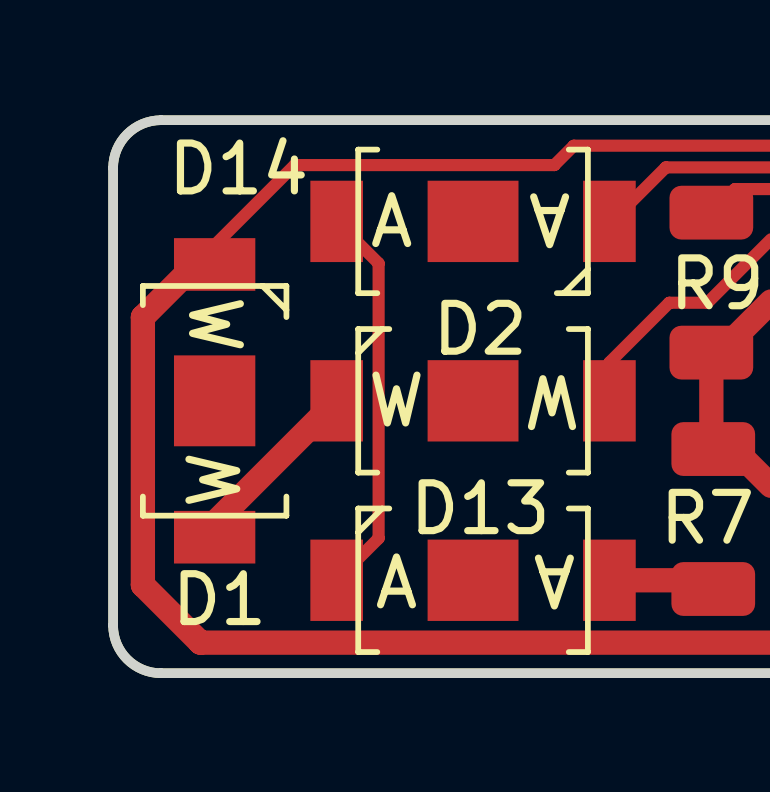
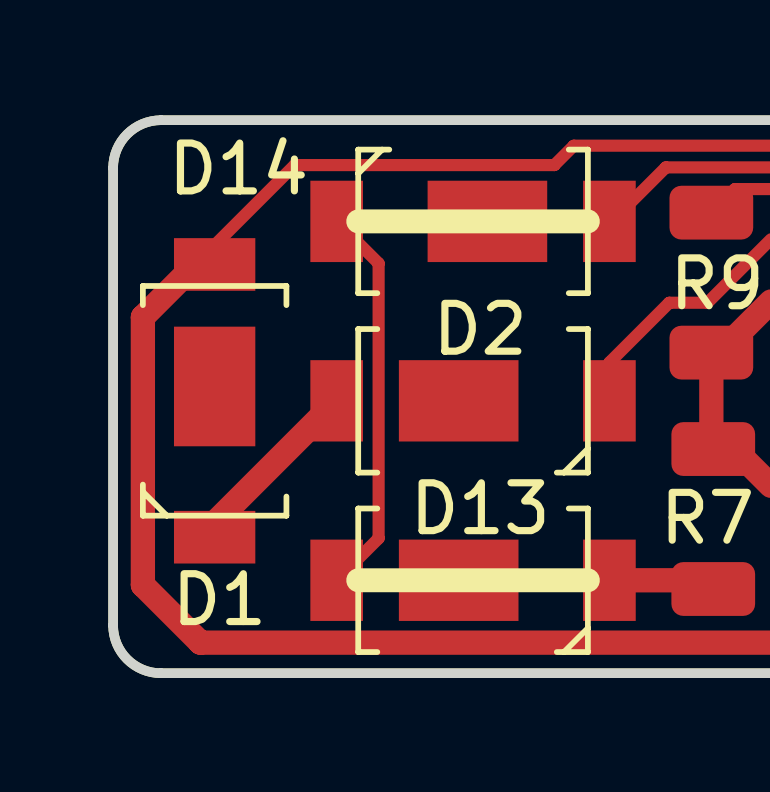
D14 footprint: [310, 146, 636, 297] -> [310, 146, 636, 297]
D1 footprint: [140, 238, 290, 564] -> [140, 238, 290, 564]
D2 footprint: [310, 326, 636, 476] -> [310, 326, 636, 476]
D13 footprint: [310, 505, 636, 655] -> [310, 505, 636, 655]

